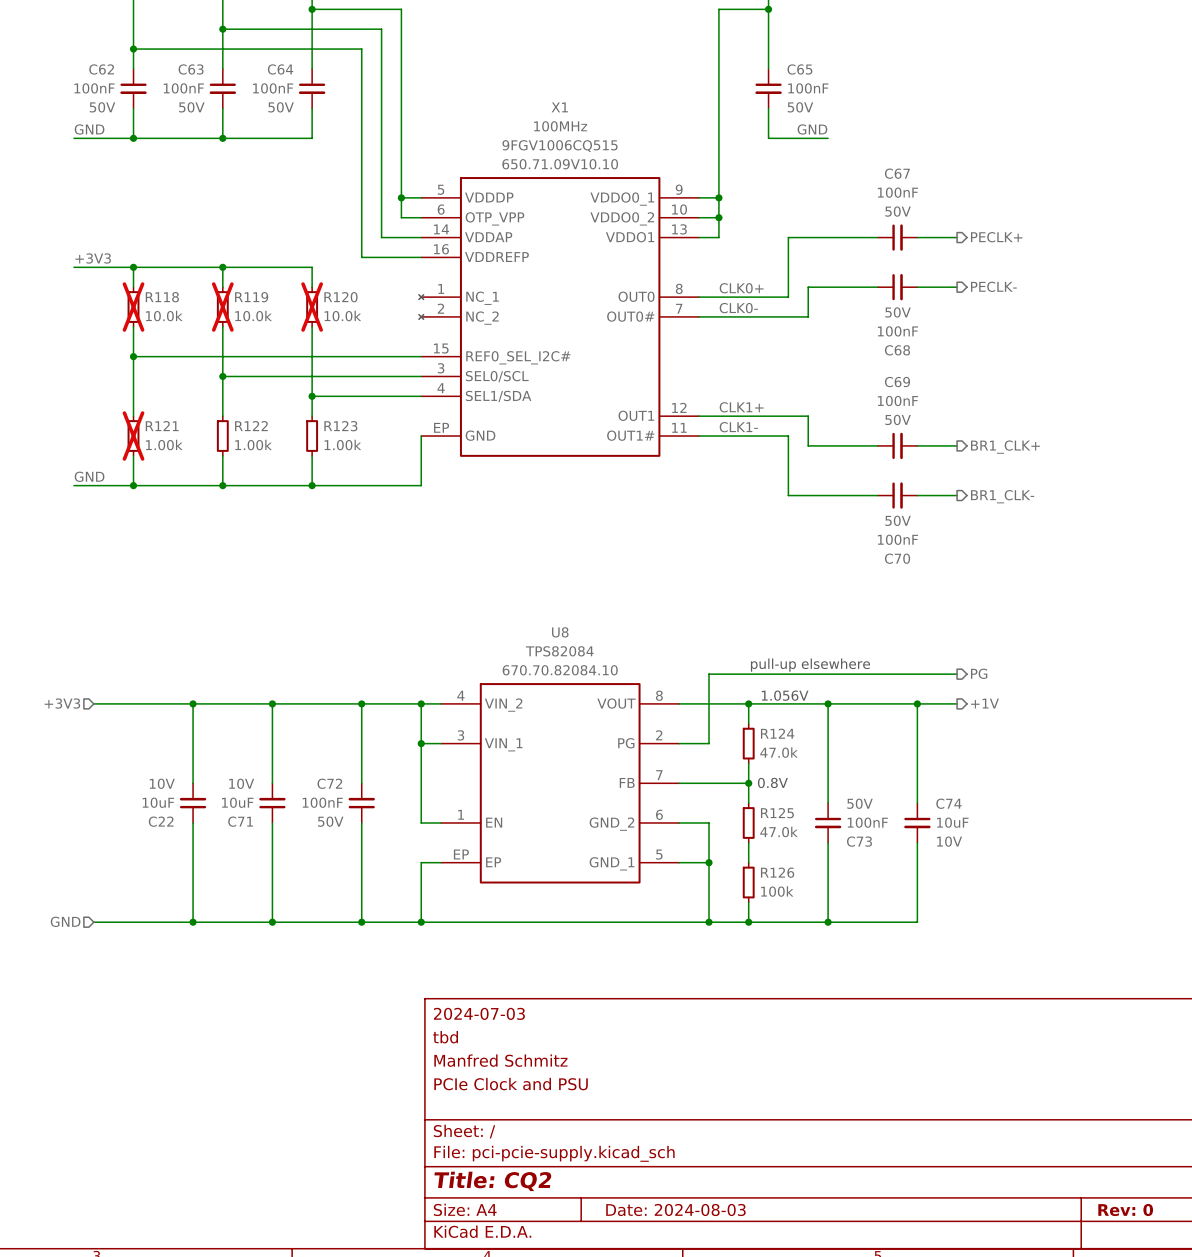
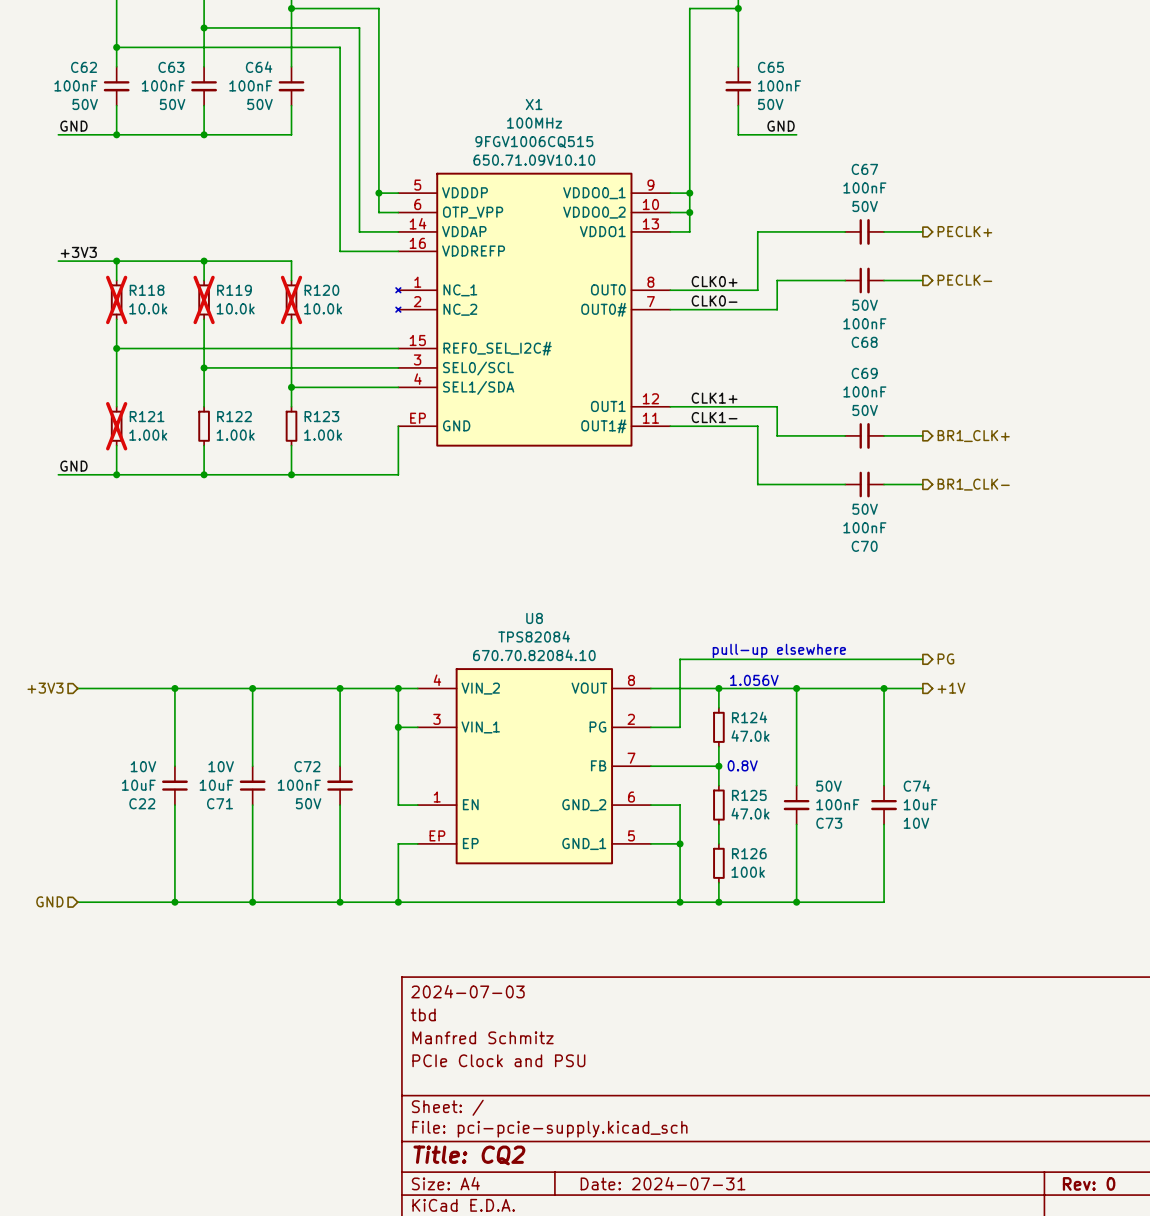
title block: Date: 2024-08-03 (675, 1210) -> Date: 2024-07-31 (663, 1183)

